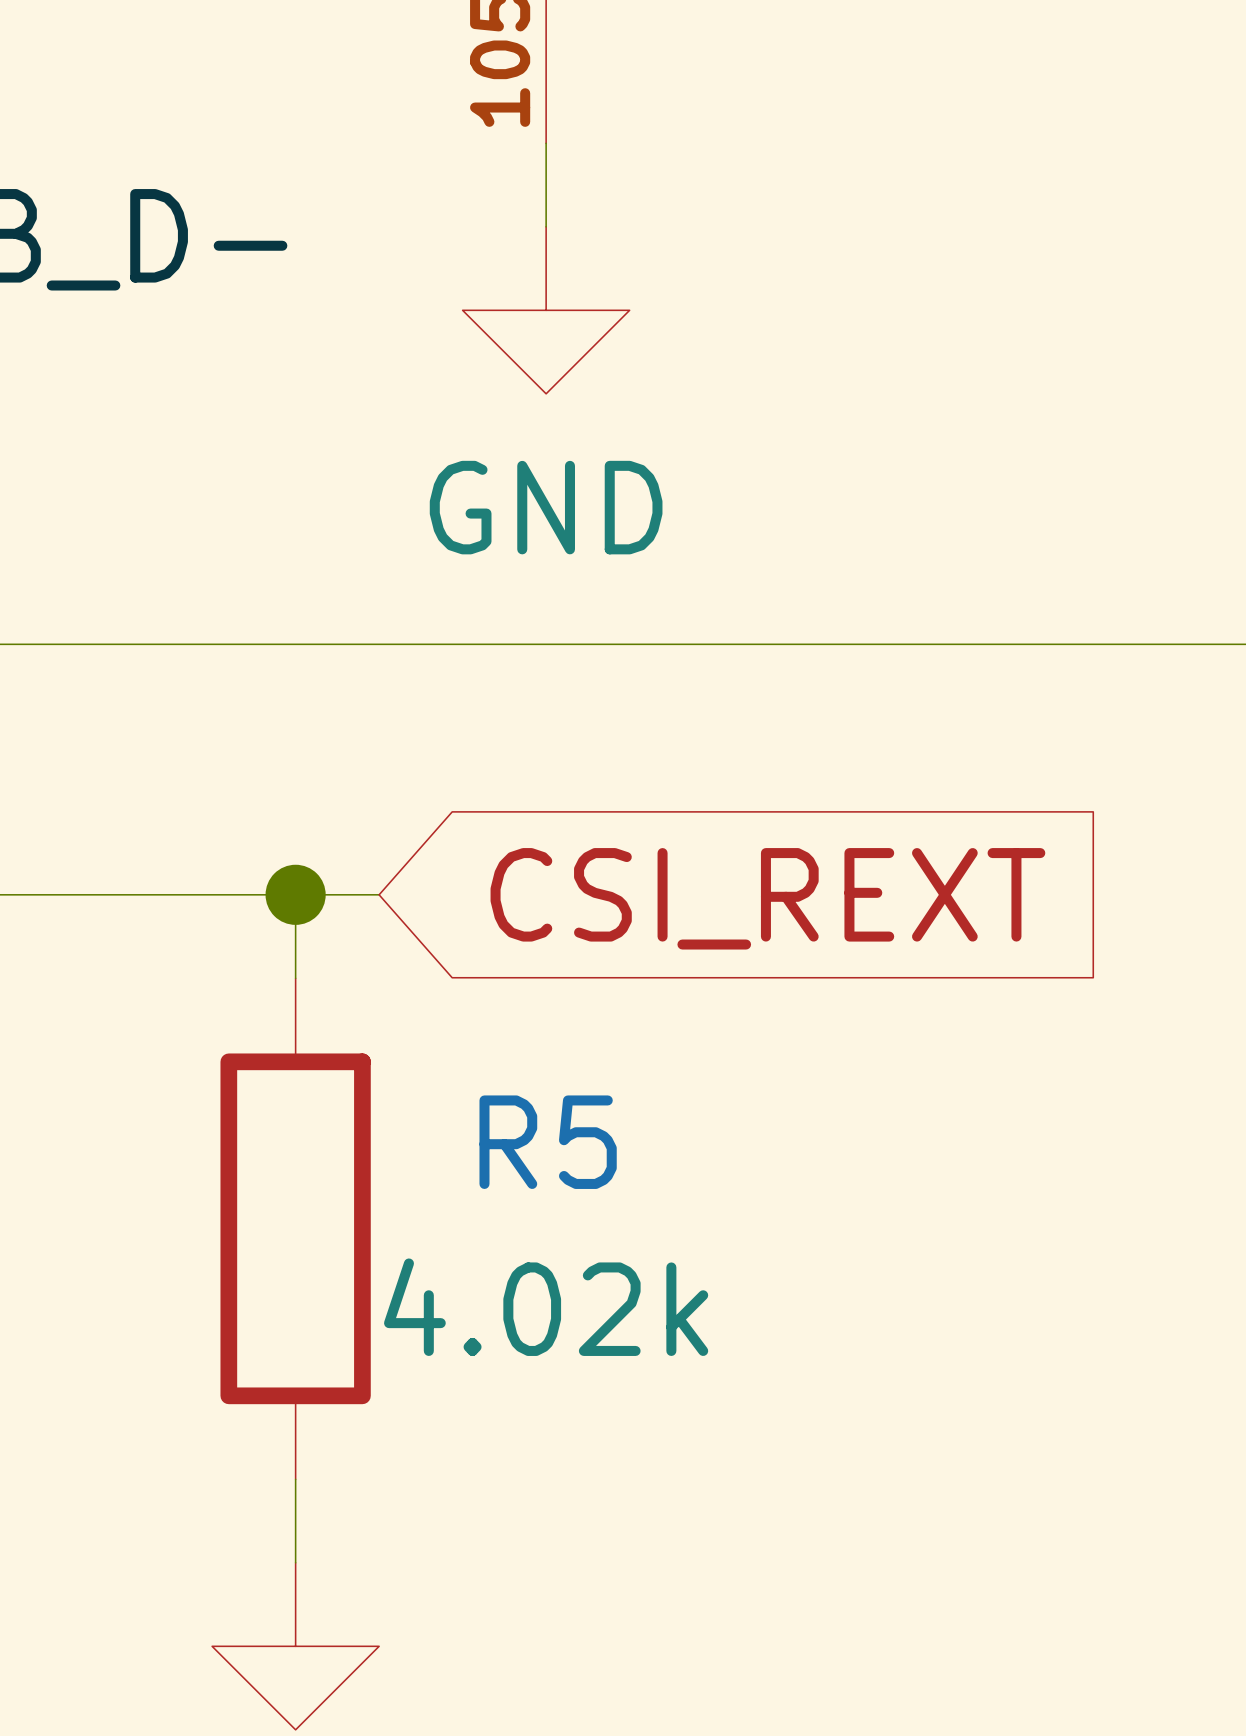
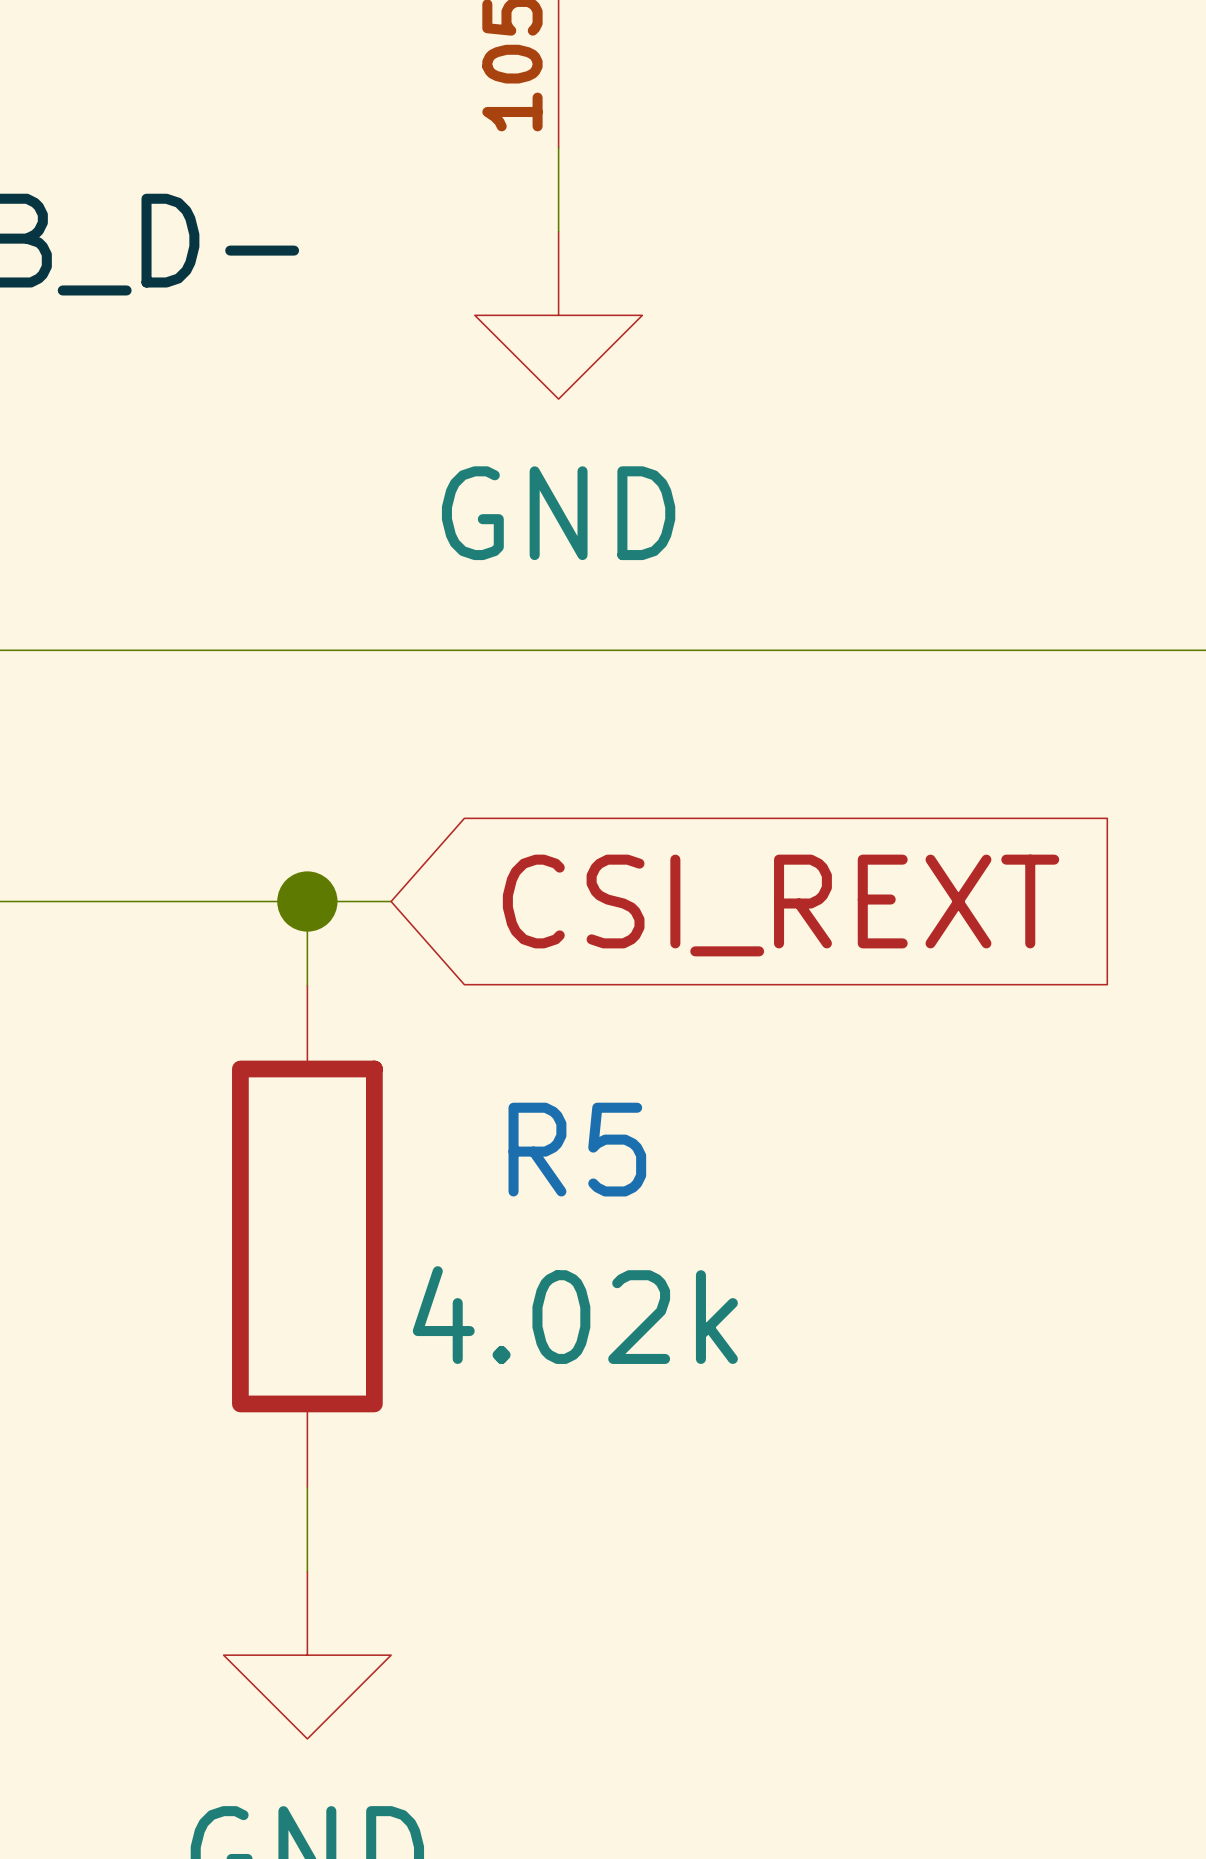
R5 name position: R5 (548, 1142) -> R5 (577, 1149)
R5 value position: 4.02k (546, 1307) -> 4.02k (575, 1315)

